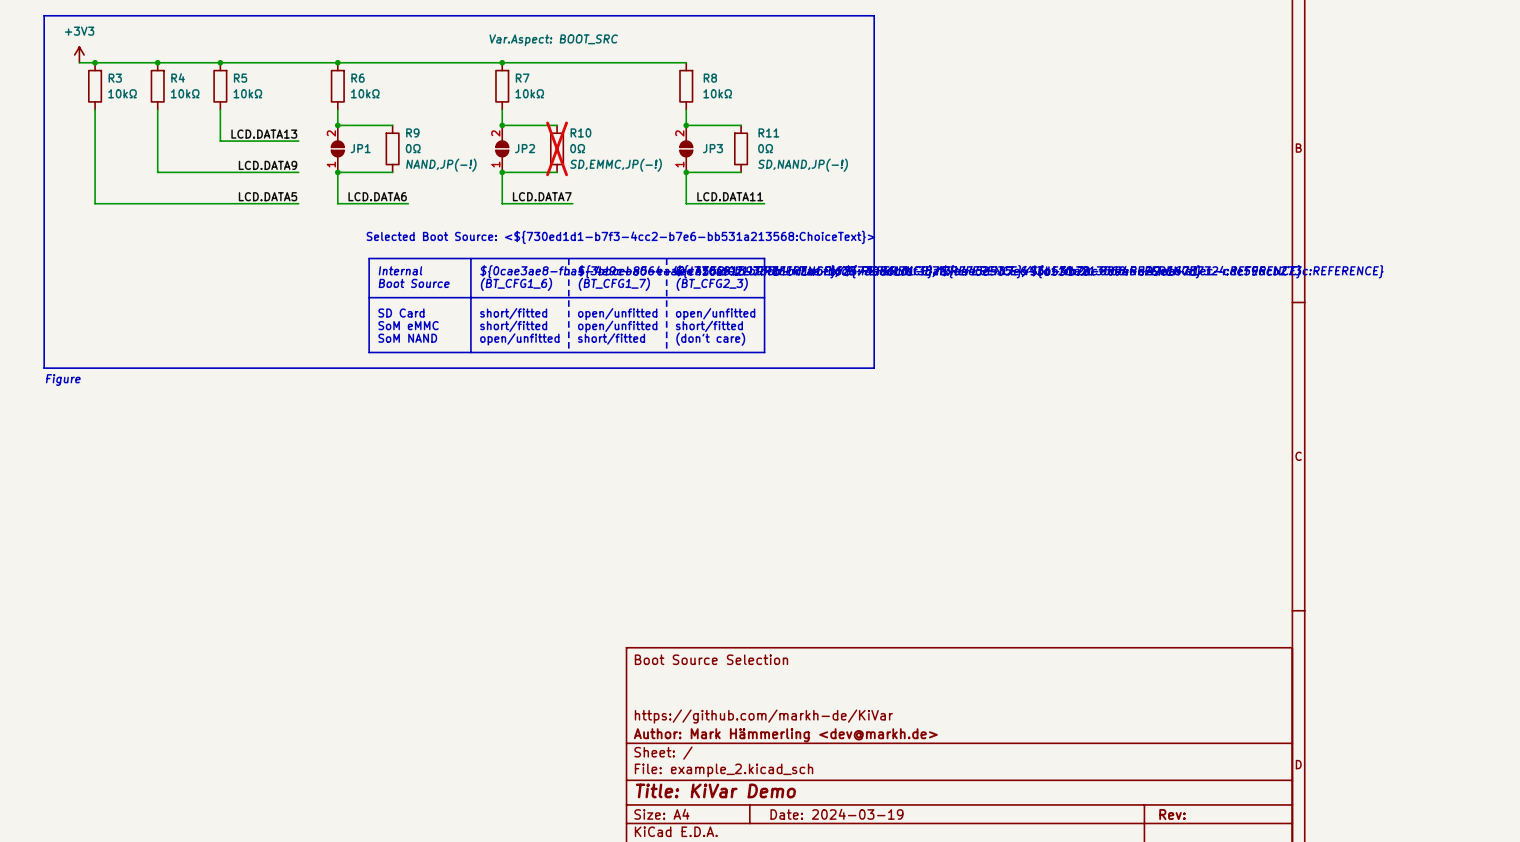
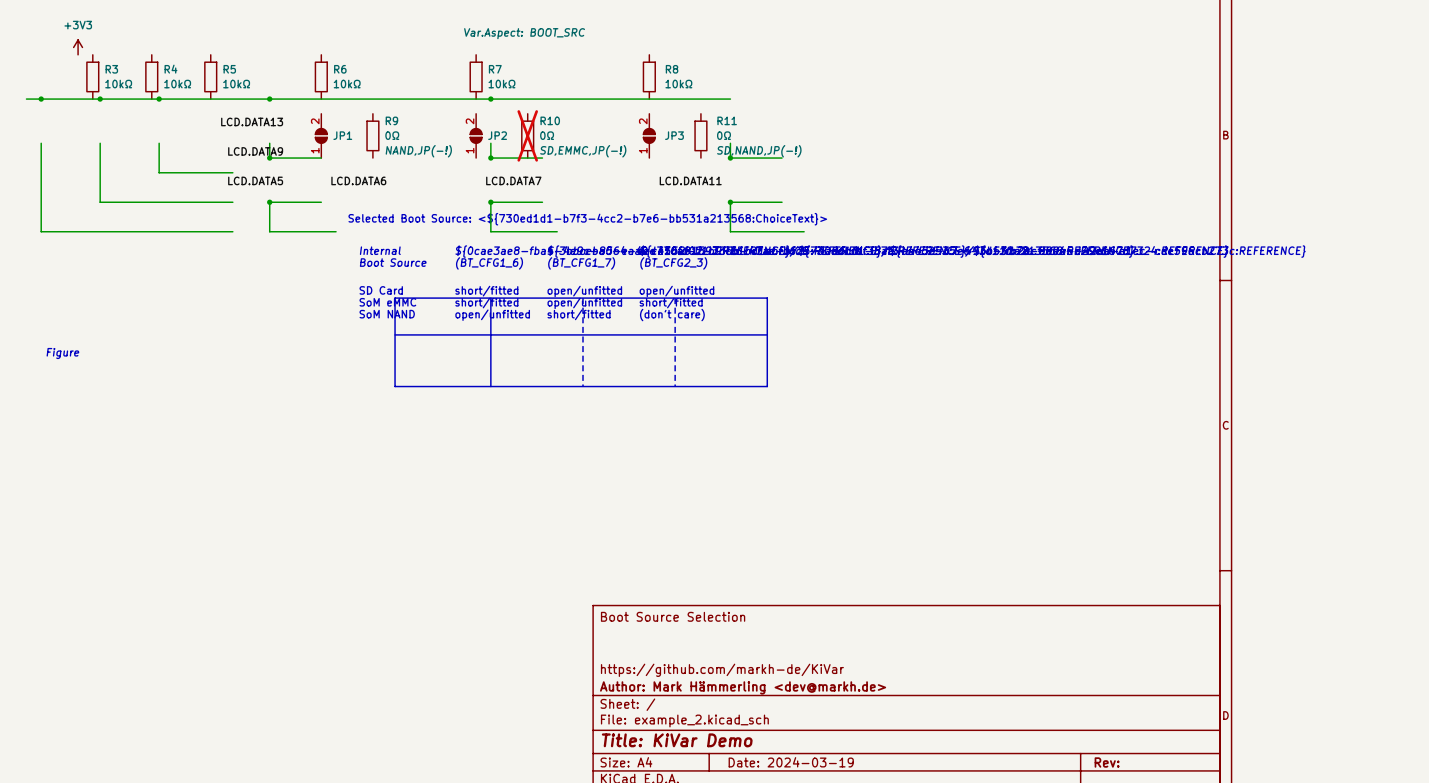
line: (44, 15) (874, 15) (874, 368) (44, 368) (44, 15) -> none
wire: (79, 62) (686, 62) -> none
junction: (95, 62) -> none
junction: (157, 62) -> none
junction: (220, 62) -> none
junction: (337, 62) -> none
junction: (502, 62) -> none
wire: none -> (26, 99) (730, 99)
junction: none -> (41, 99)
wire: (95, 109) (95, 203) (298, 203) -> (41, 143) (41, 231) (232, 231)
junction: none -> (100, 99)
wire: (157, 109) (157, 172) (283, 172) -> (269, 143) (269, 158)
junction: none -> (159, 99)
wire: (220, 109) (220, 141) (298, 141) -> (159, 143) (159, 172) (232, 172)
junction: none -> (269, 99)
wire: (337, 109) (337, 125) (392, 125) -> none
wire: (502, 109) (502, 125) (557, 125) -> none
wire: (686, 109) (686, 125) (741, 125) -> (730, 143) (730, 158) (782, 158)
junction: (337, 125) -> none
junction position: (502, 125) -> (490, 99)
junction: (686, 125) -> none
wire: none -> (100, 143) (100, 202) (232, 202)
junction: none -> (269, 158)
wire: none -> (284, 158) (321, 158)
junction: (337, 172) -> none
wire: (392, 172) (337, 172) (337, 203) (408, 203) -> (321, 202) (269, 202) (269, 231) (336, 231)
junction position: (502, 172) -> (490, 158)
wire: (517, 172) (502, 172) (502, 203) (572, 203) -> (490, 158) (490, 143)
wire: none -> (527, 158) (542, 158)
junction: (686, 172) -> none
wire: (741, 172) (686, 172) (686, 203) (764, 203) -> (782, 202) (730, 202) (730, 231) (804, 231)
junction: none -> (730, 158)
junction: none -> (269, 202)
junction: none -> (490, 202)
wire: none -> (542, 202) (490, 202) (490, 231) (557, 231)
junction: none -> (730, 202)
line: (369, 258) (369, 352) (764, 352) (764, 258) (369, 258) -> (395, 298) (395, 386) (767, 386) (767, 298) (395, 298)
line: (470, 258) (470, 352) -> (490, 298) (490, 386)
line: (568, 258) (568, 352) -> (583, 298) (583, 386)
line: (666, 258) (666, 352) -> (675, 298) (675, 386)
line: (369, 297) (764, 297) -> (395, 334) (767, 334)

